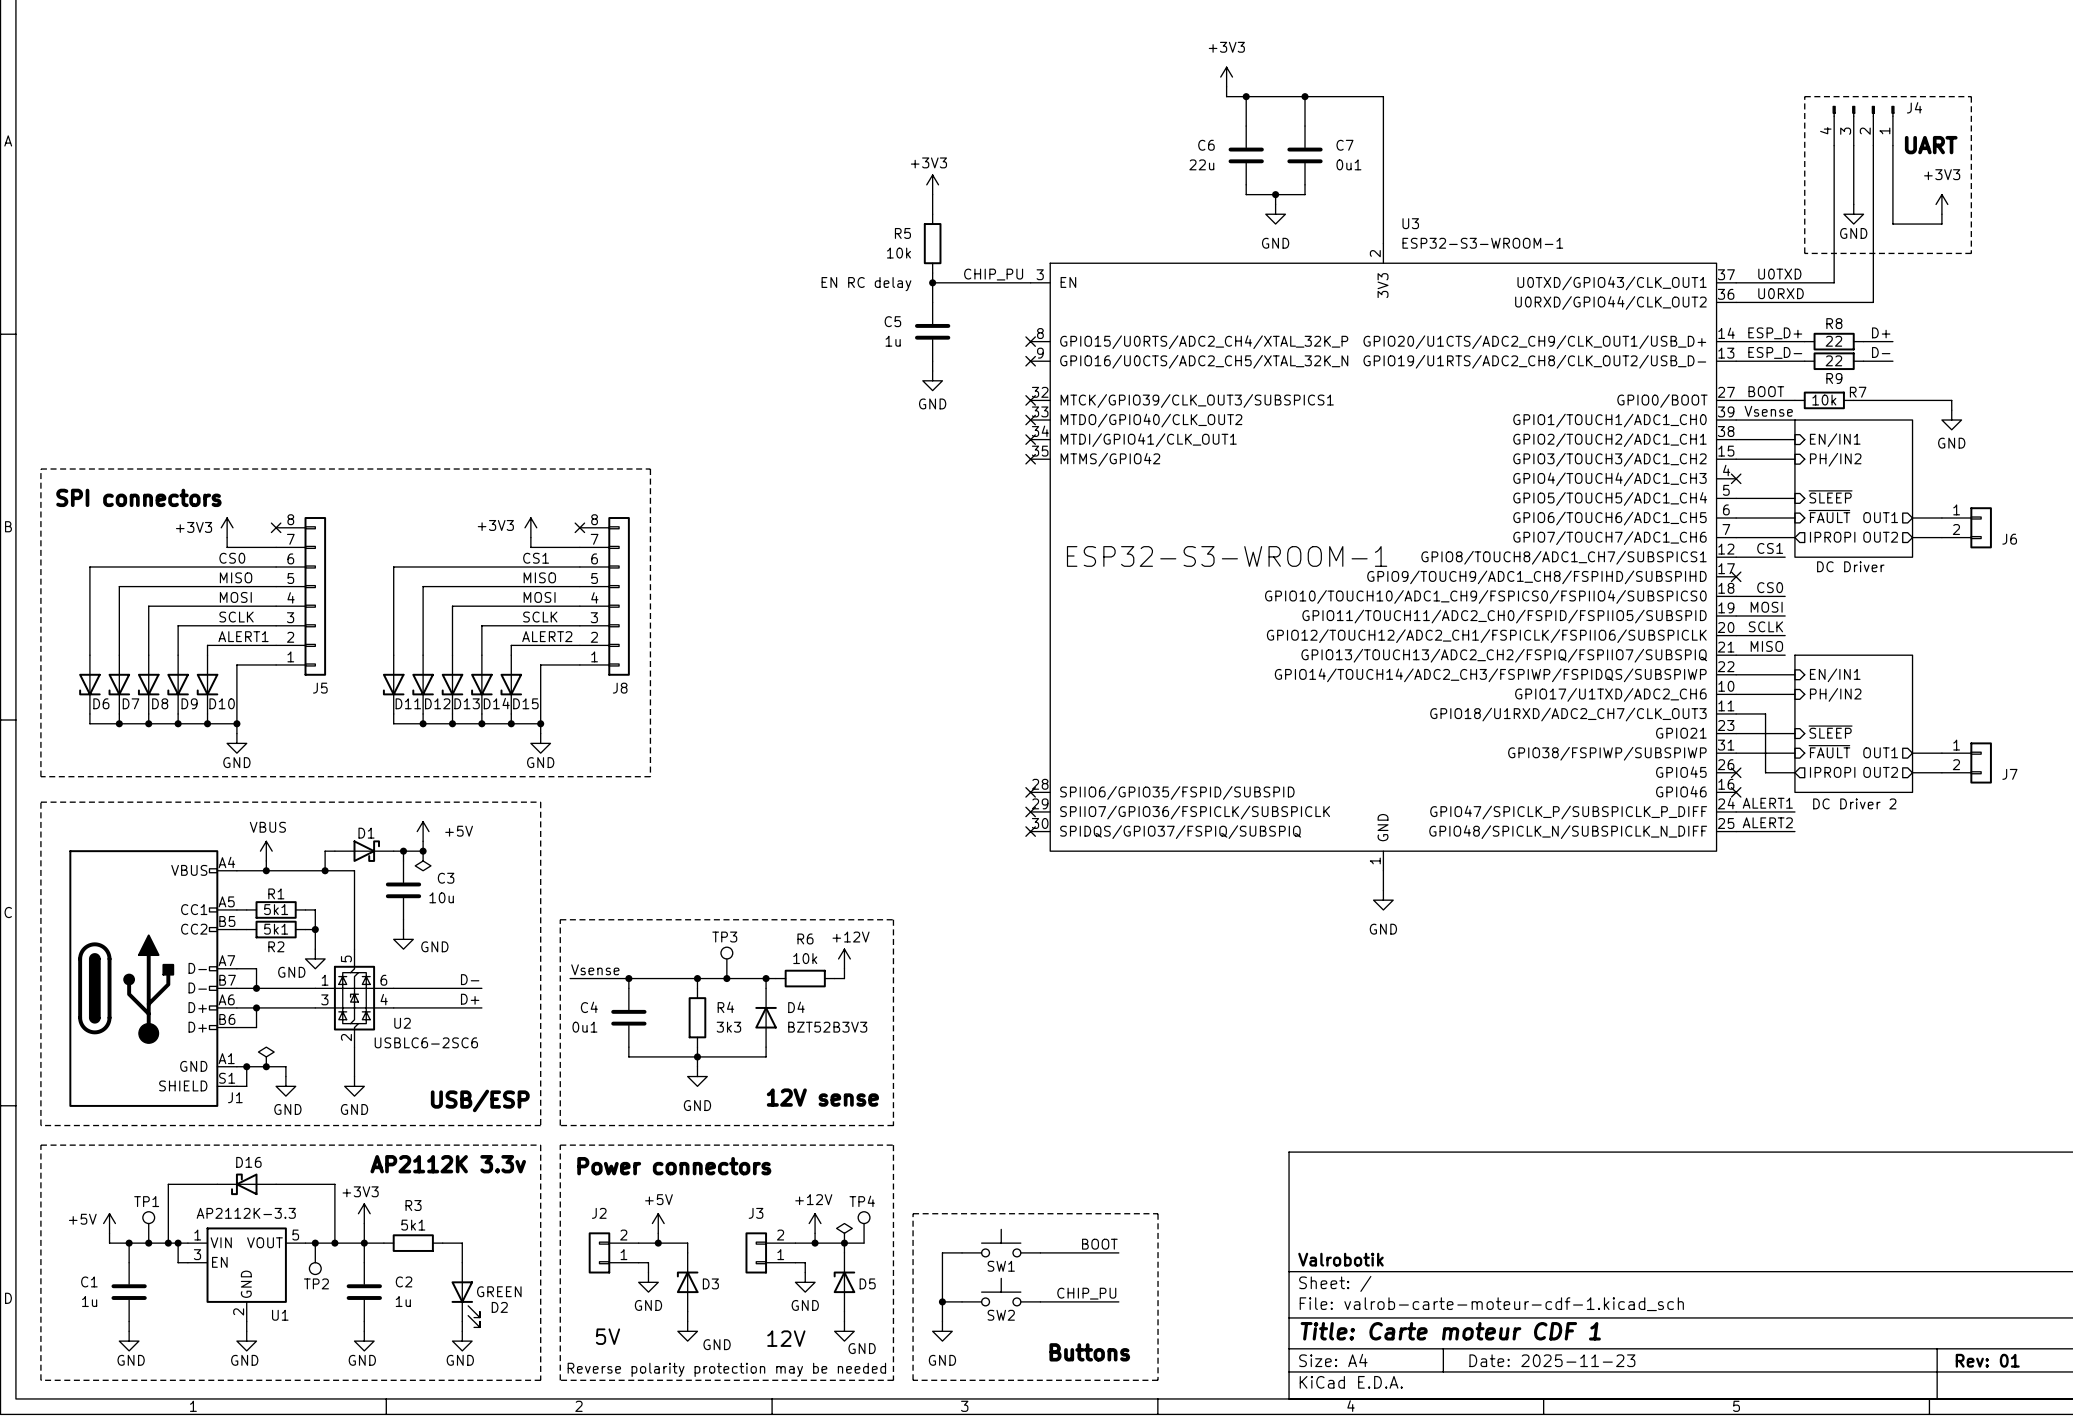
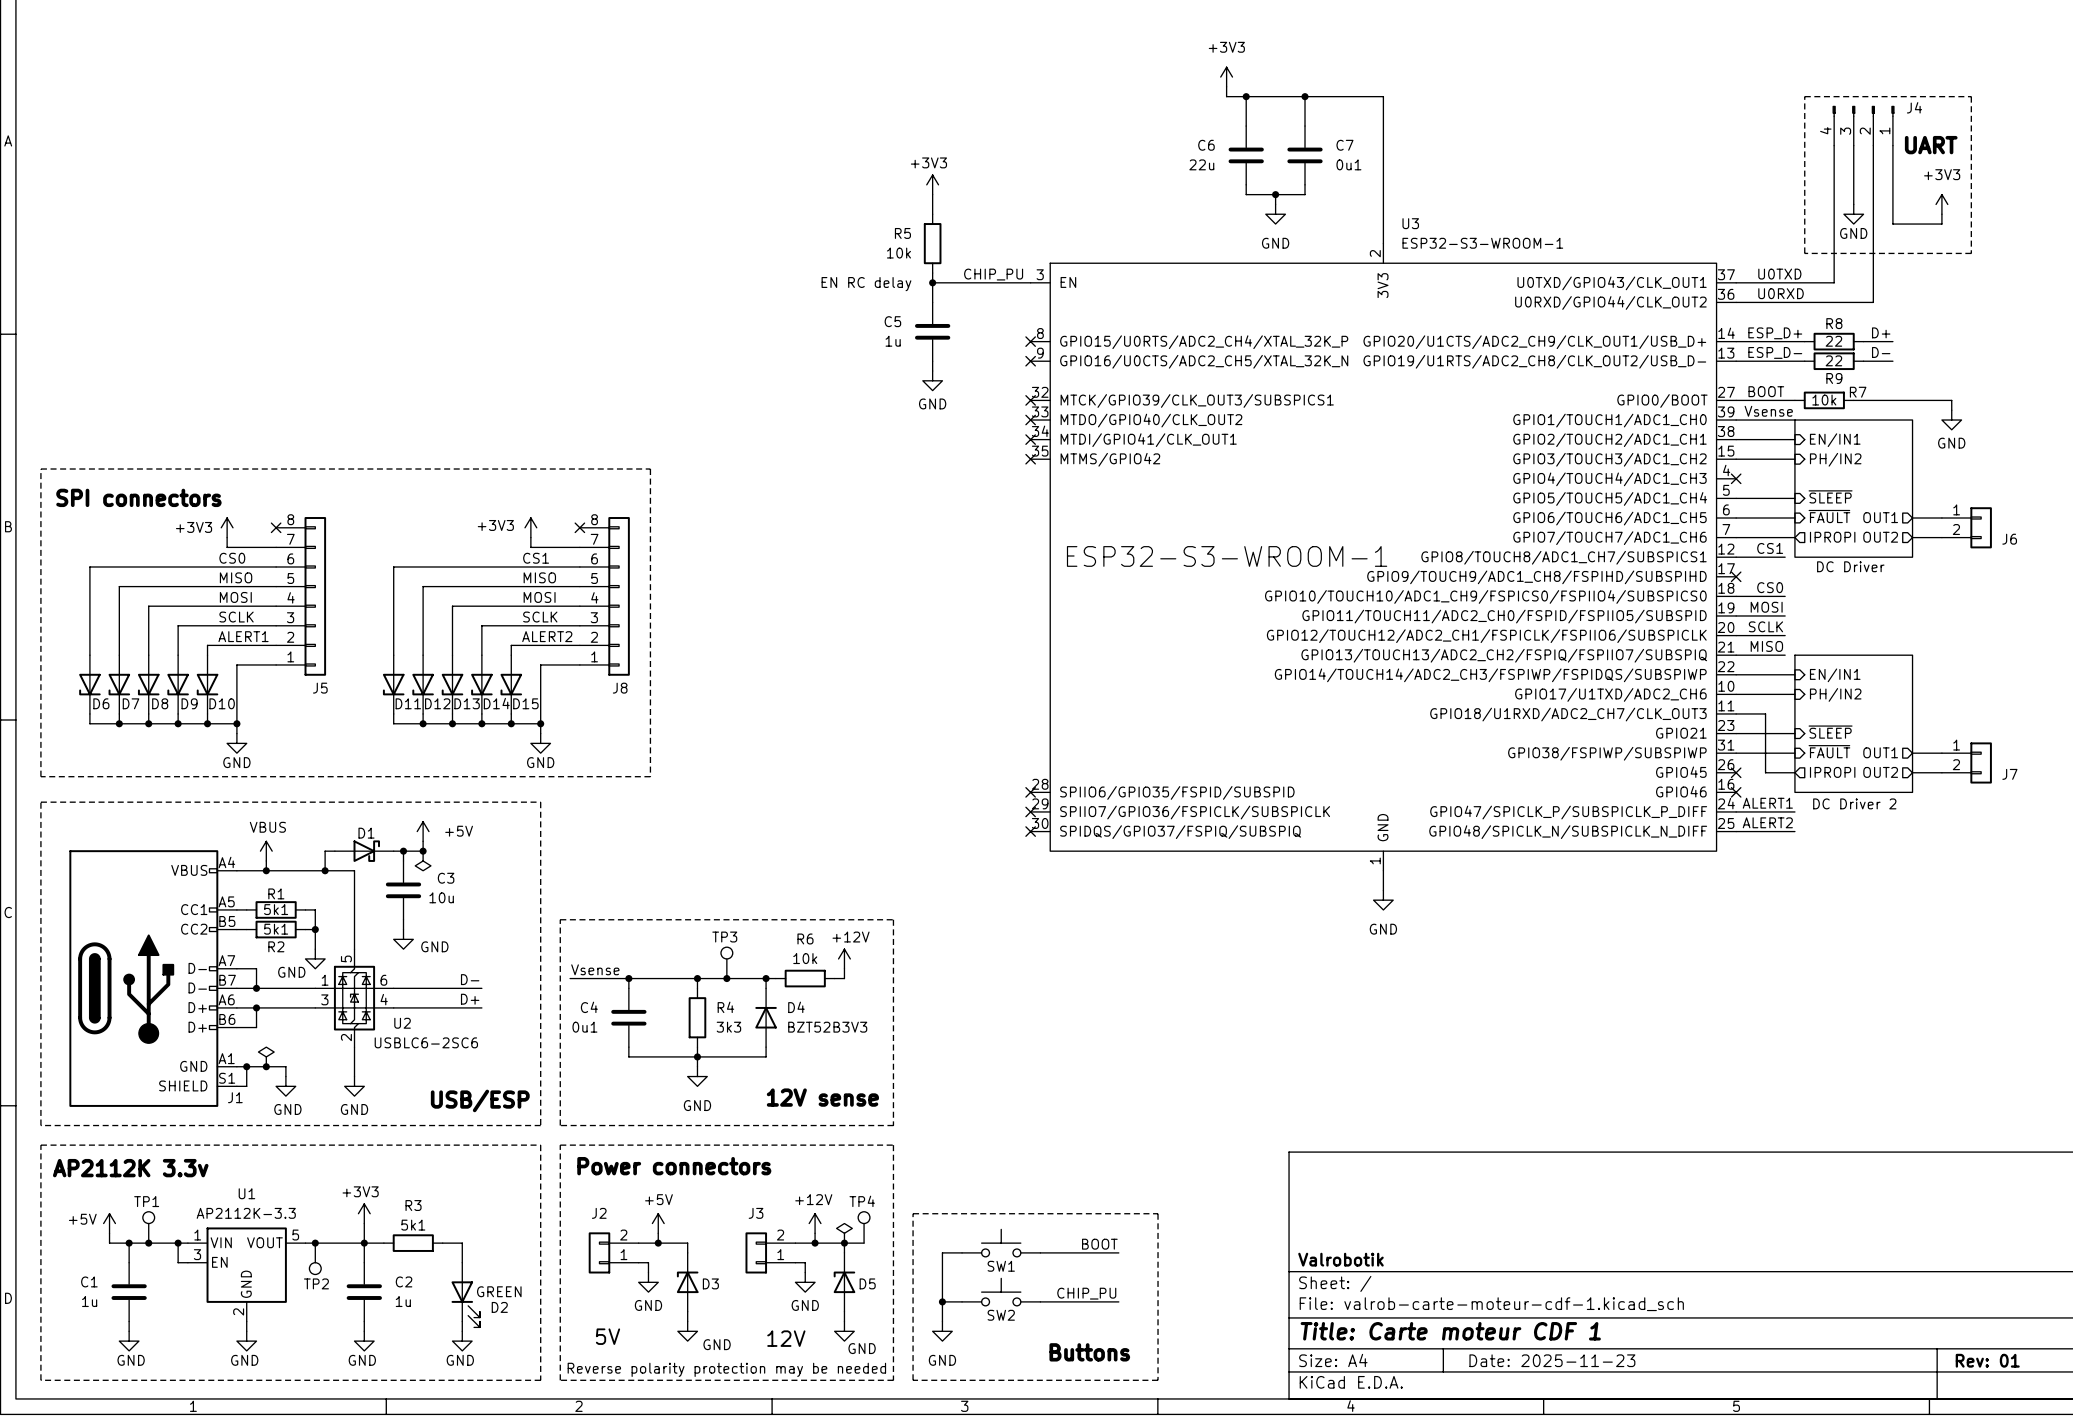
text: AP2112K 3.3v (448, 1164) -> none
text: none -> AP2112K 3.3v (130, 1168)
wire: (217, 1184) (168, 1184) (168, 1243) -> none
D16: (246, 1184) -> none
wire: (276, 1184) (334, 1184) (334, 1243) -> none
junction: (168, 1243) -> none
junction: (334, 1243) -> none
U1 name position: U1 (280, 1315) -> U1 (246, 1193)

